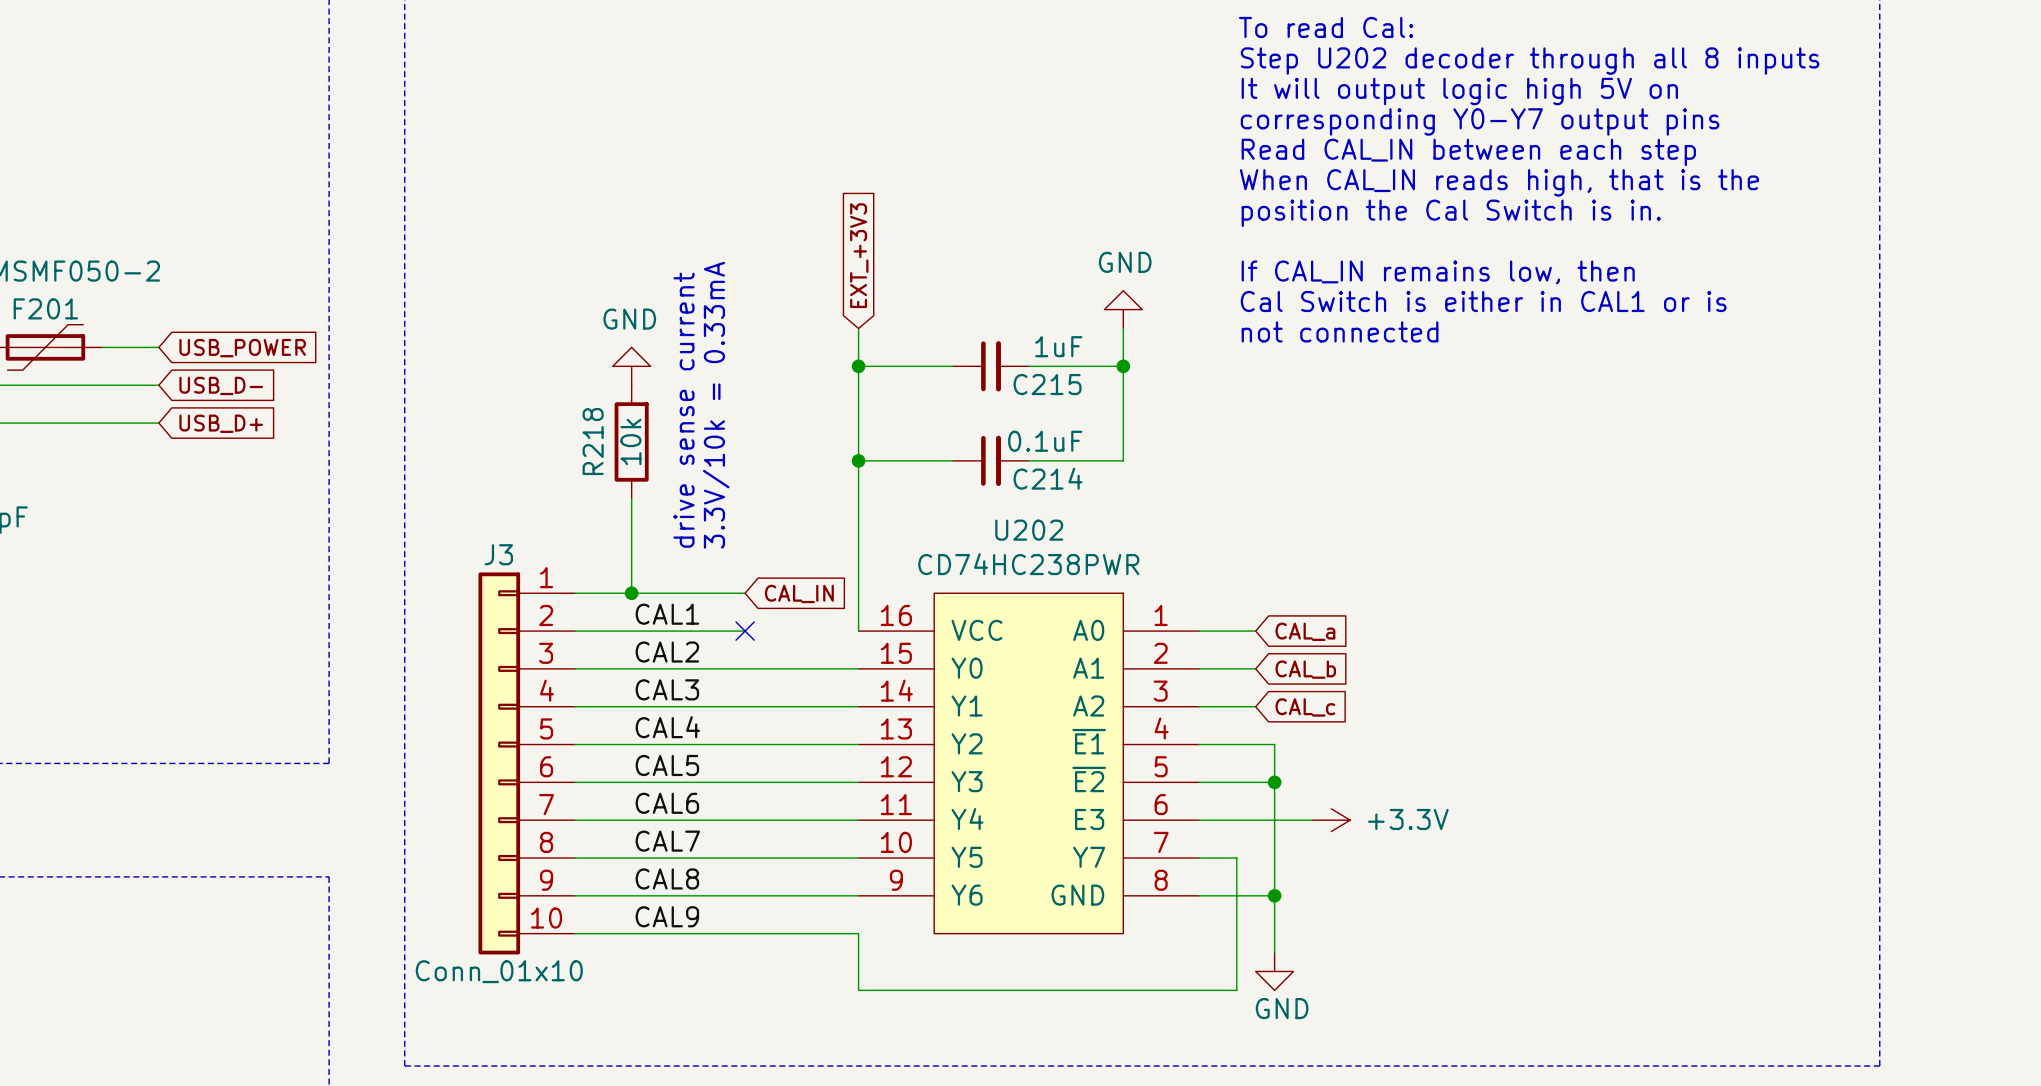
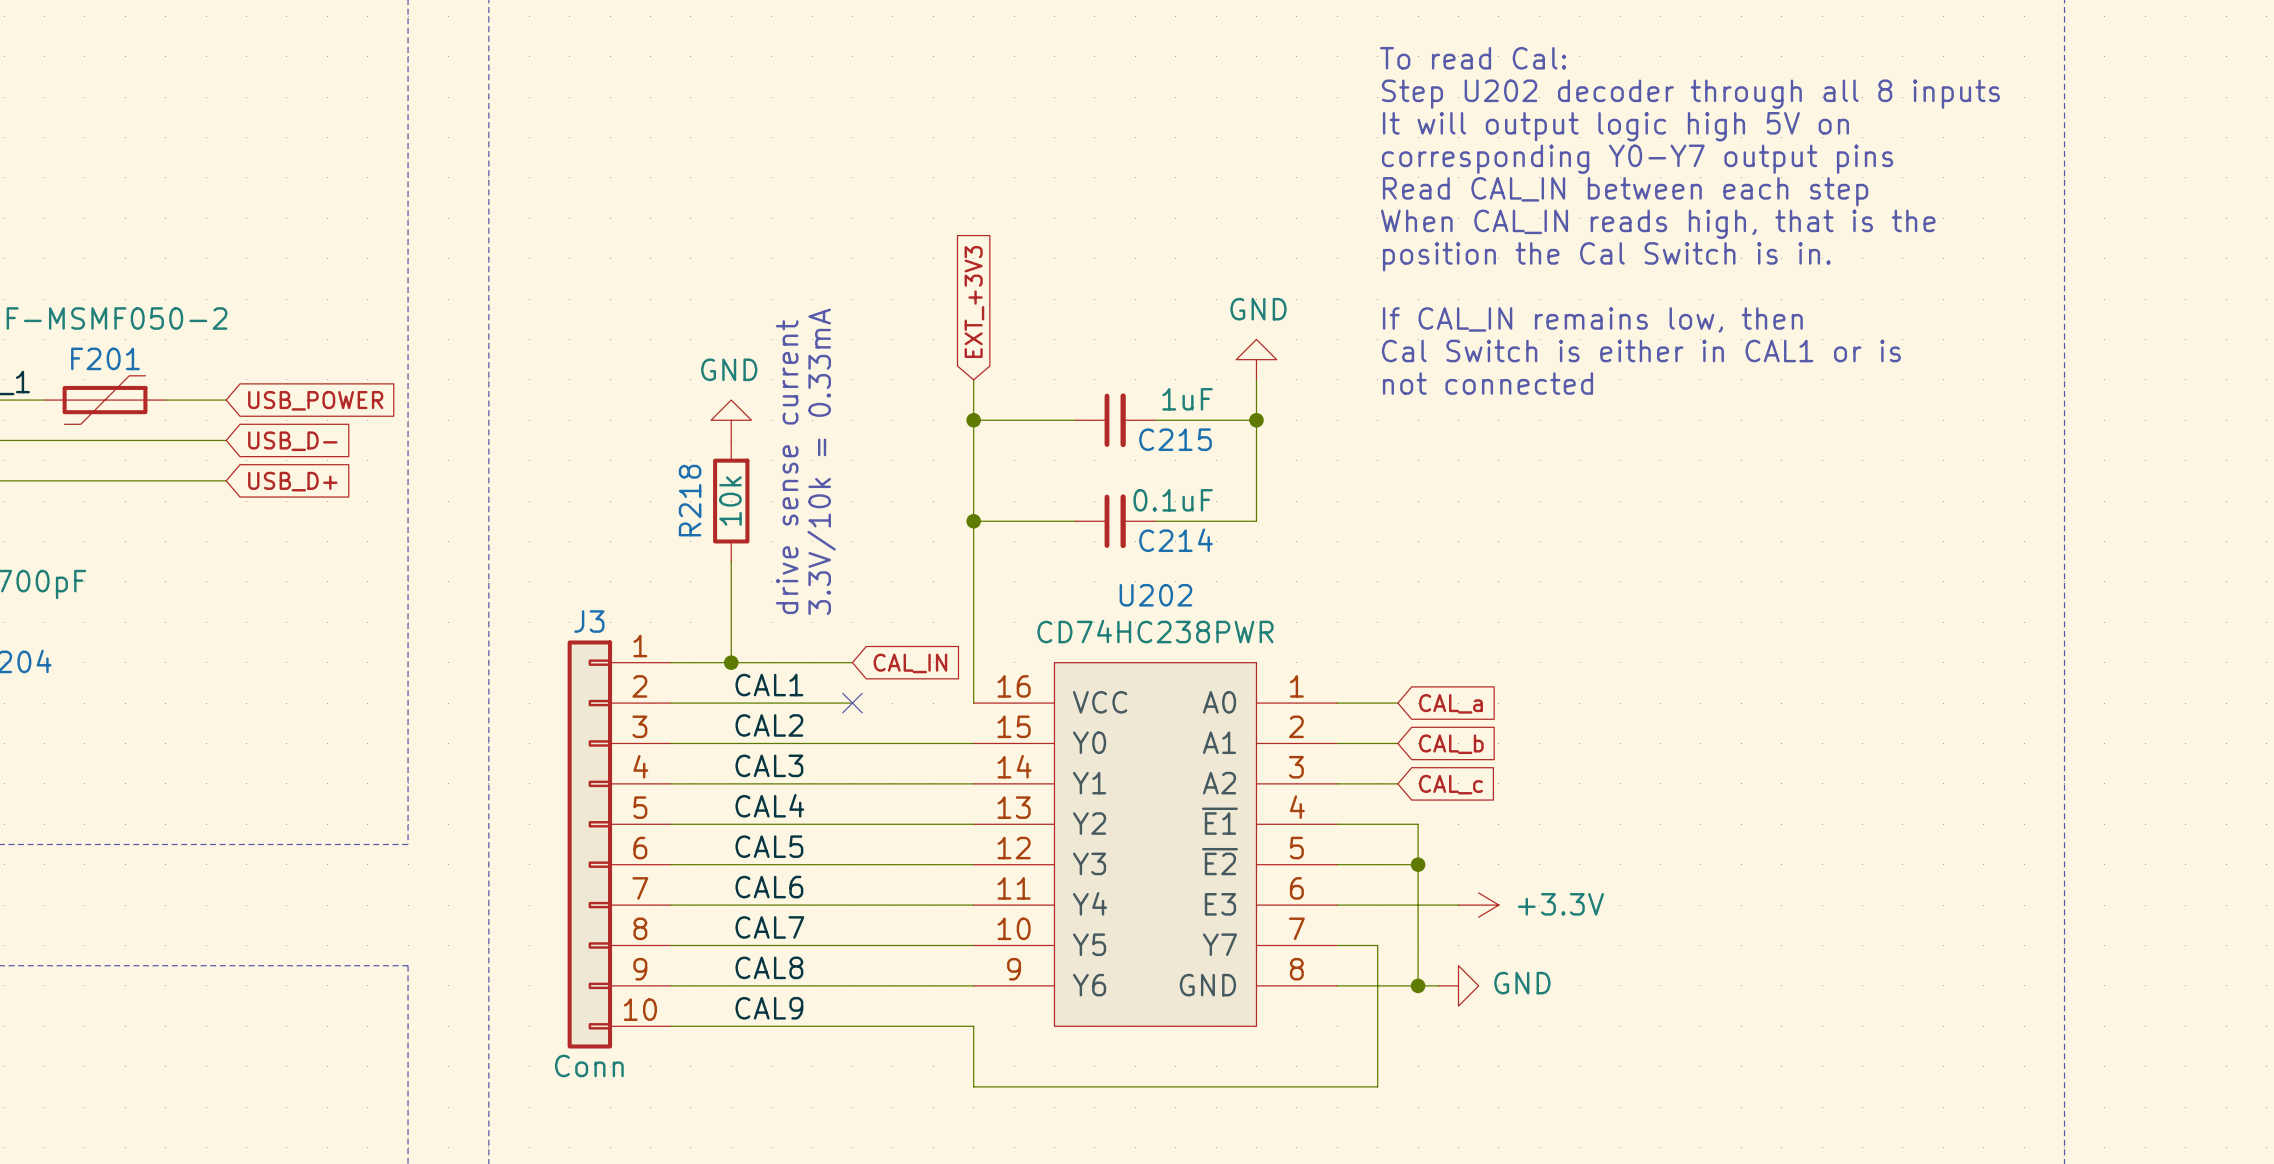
wire: (1274, 895) (1274, 952) -> (1418, 985) (1438, 985)
J3 value: Conn_01x10 (499, 971) -> Conn (589, 1065)
power symbol rotation: 0° (1274, 971) -> 90° counterclockwise (1458, 985)
power symbol position: GND (1274, 971) -> GND (1458, 985)

